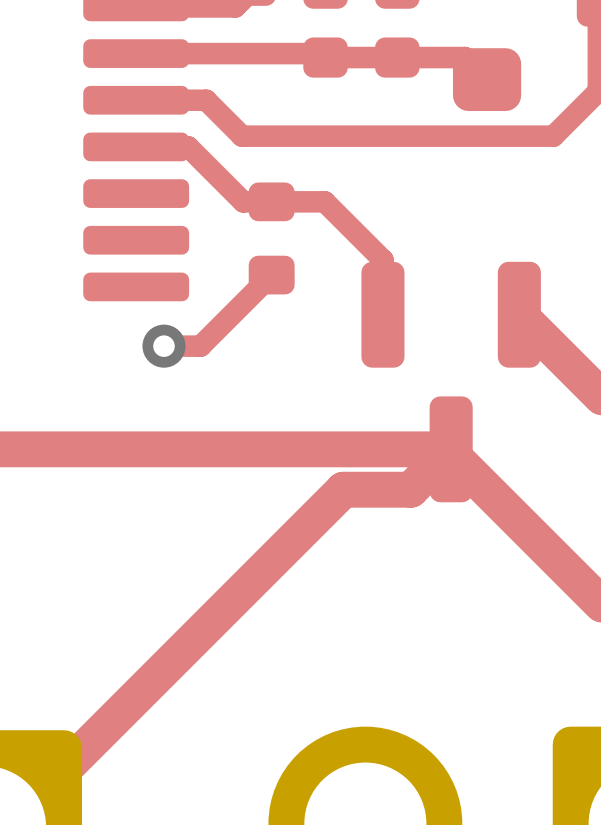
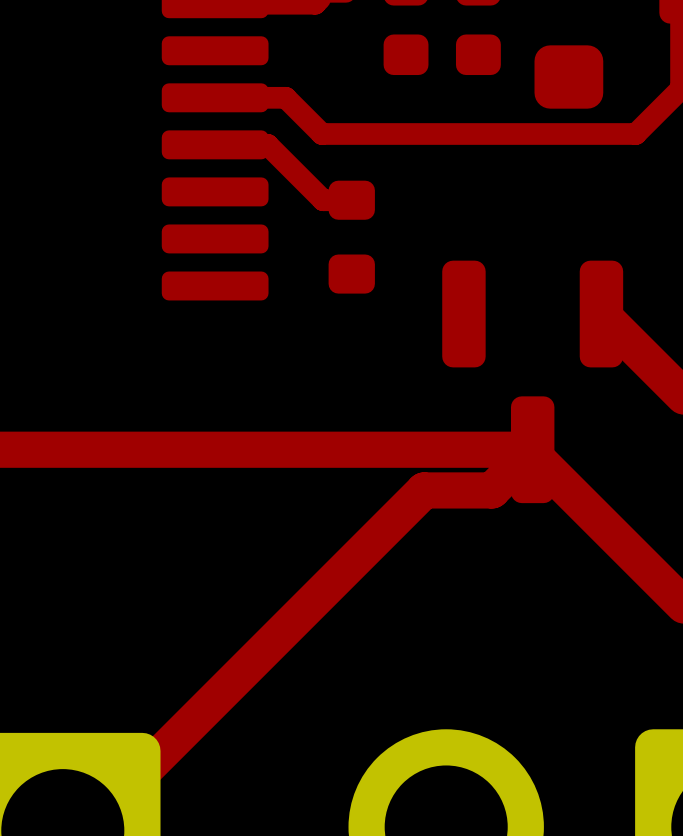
top track: (136, 53) (321, 53) (325, 57) (464, 57) (487, 79) -> none
top track: (271, 201) (324, 201) (382, 260) (382, 314) -> none
top track: (271, 275) (200, 346) (163, 346) -> none
via: (163, 346) -> none

